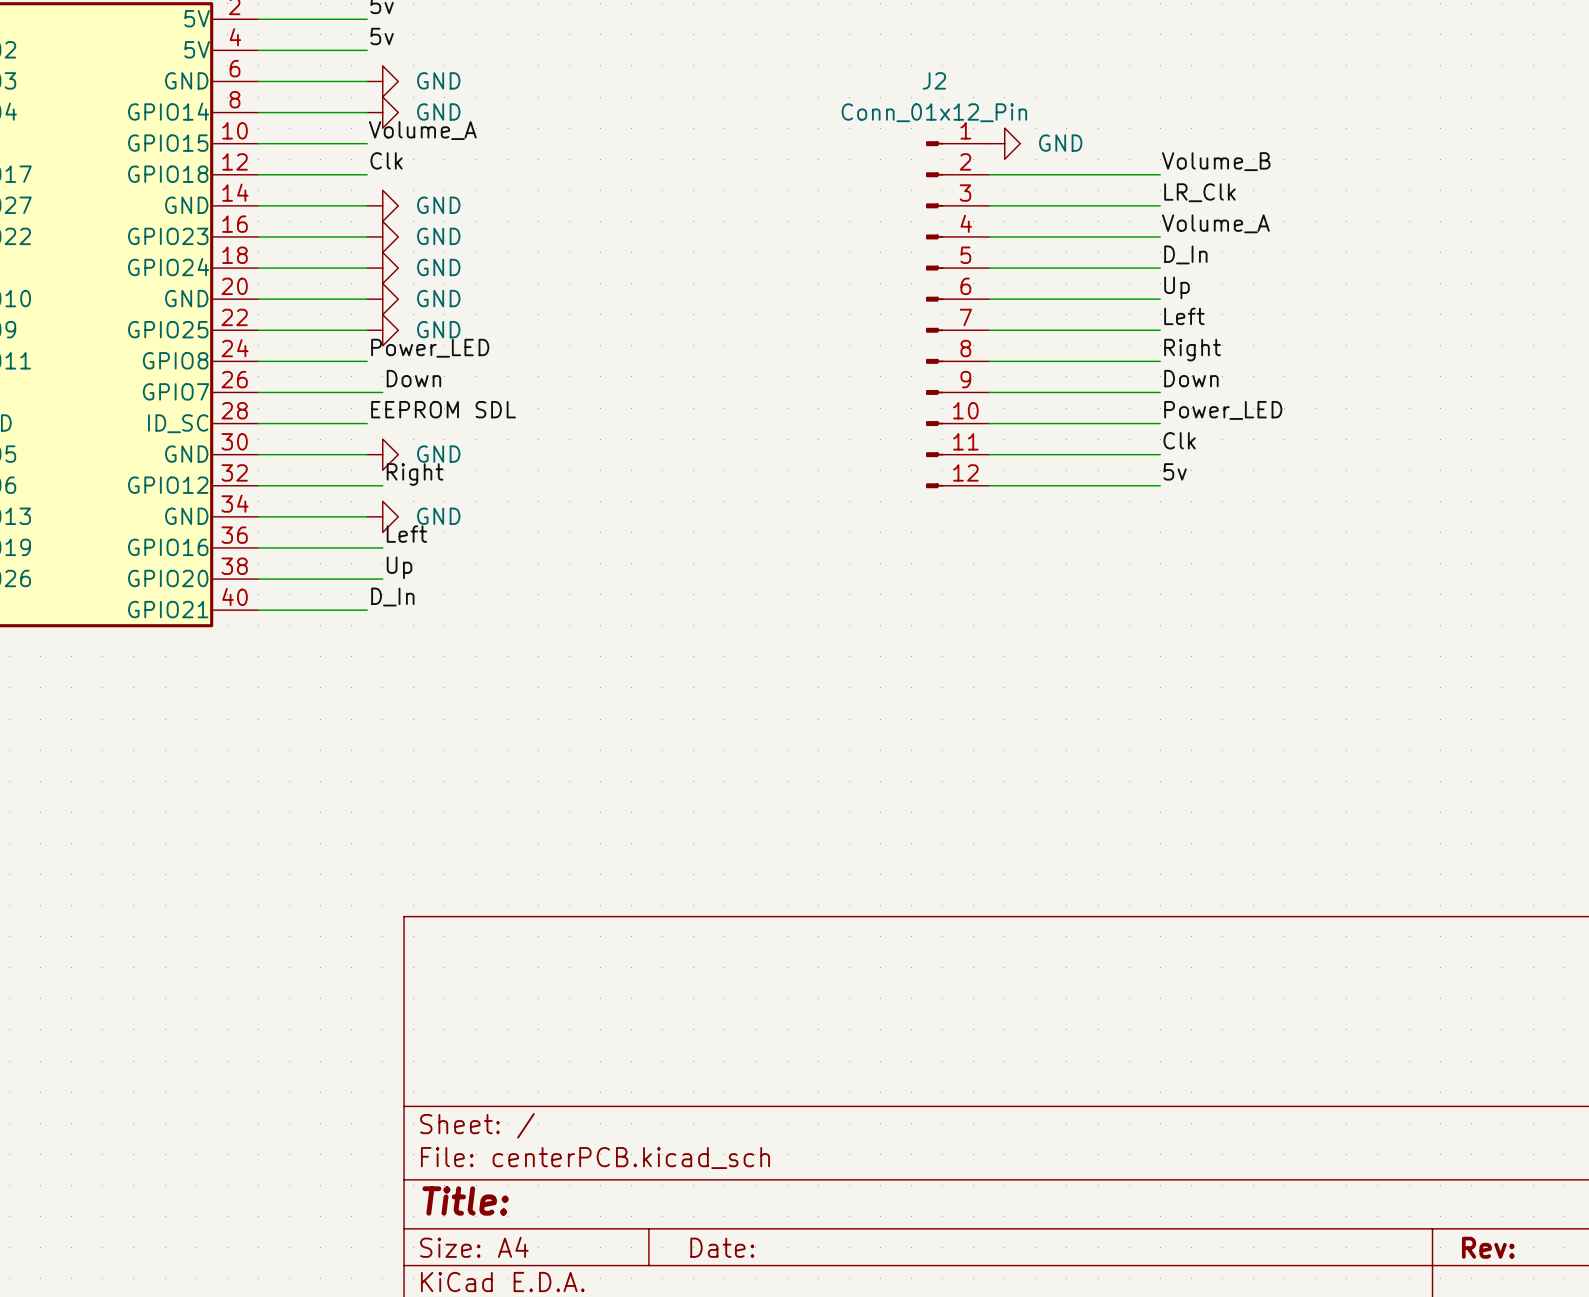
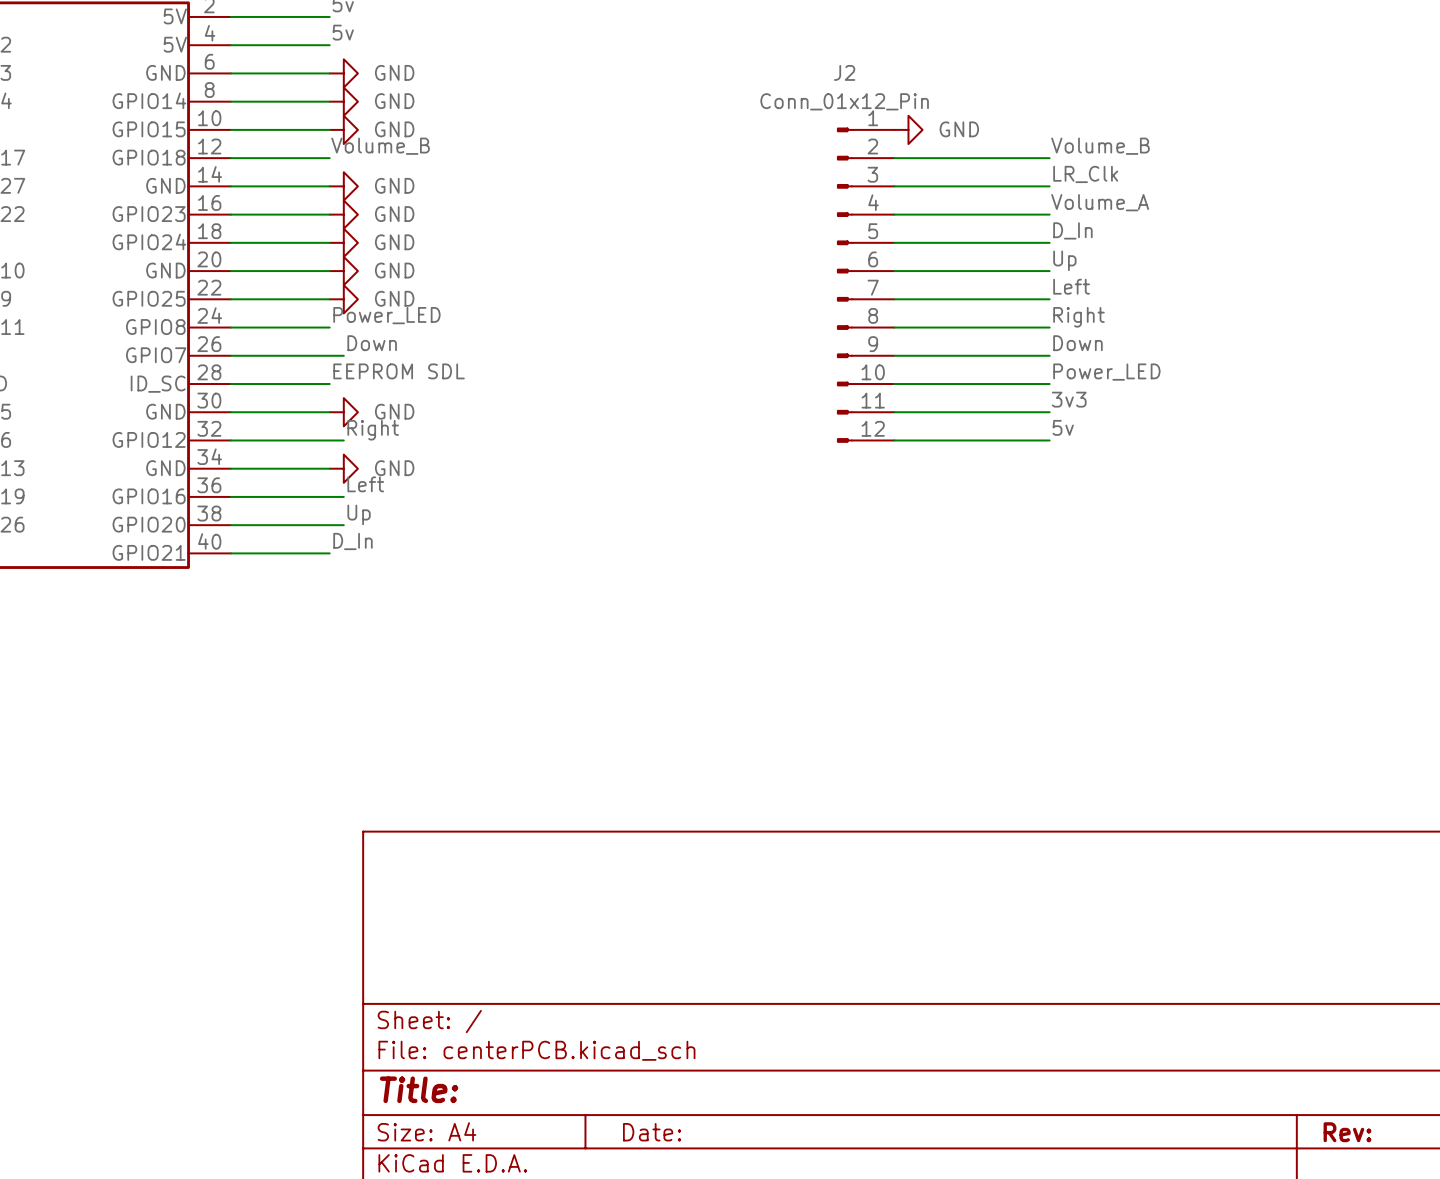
label: Volume_A (422, 130) -> none
power symbol: none -> GND (343, 129)
label: Clk (386, 160) -> Volume_B (380, 146)
label: Clk (1179, 440) -> 3v3 (1069, 399)

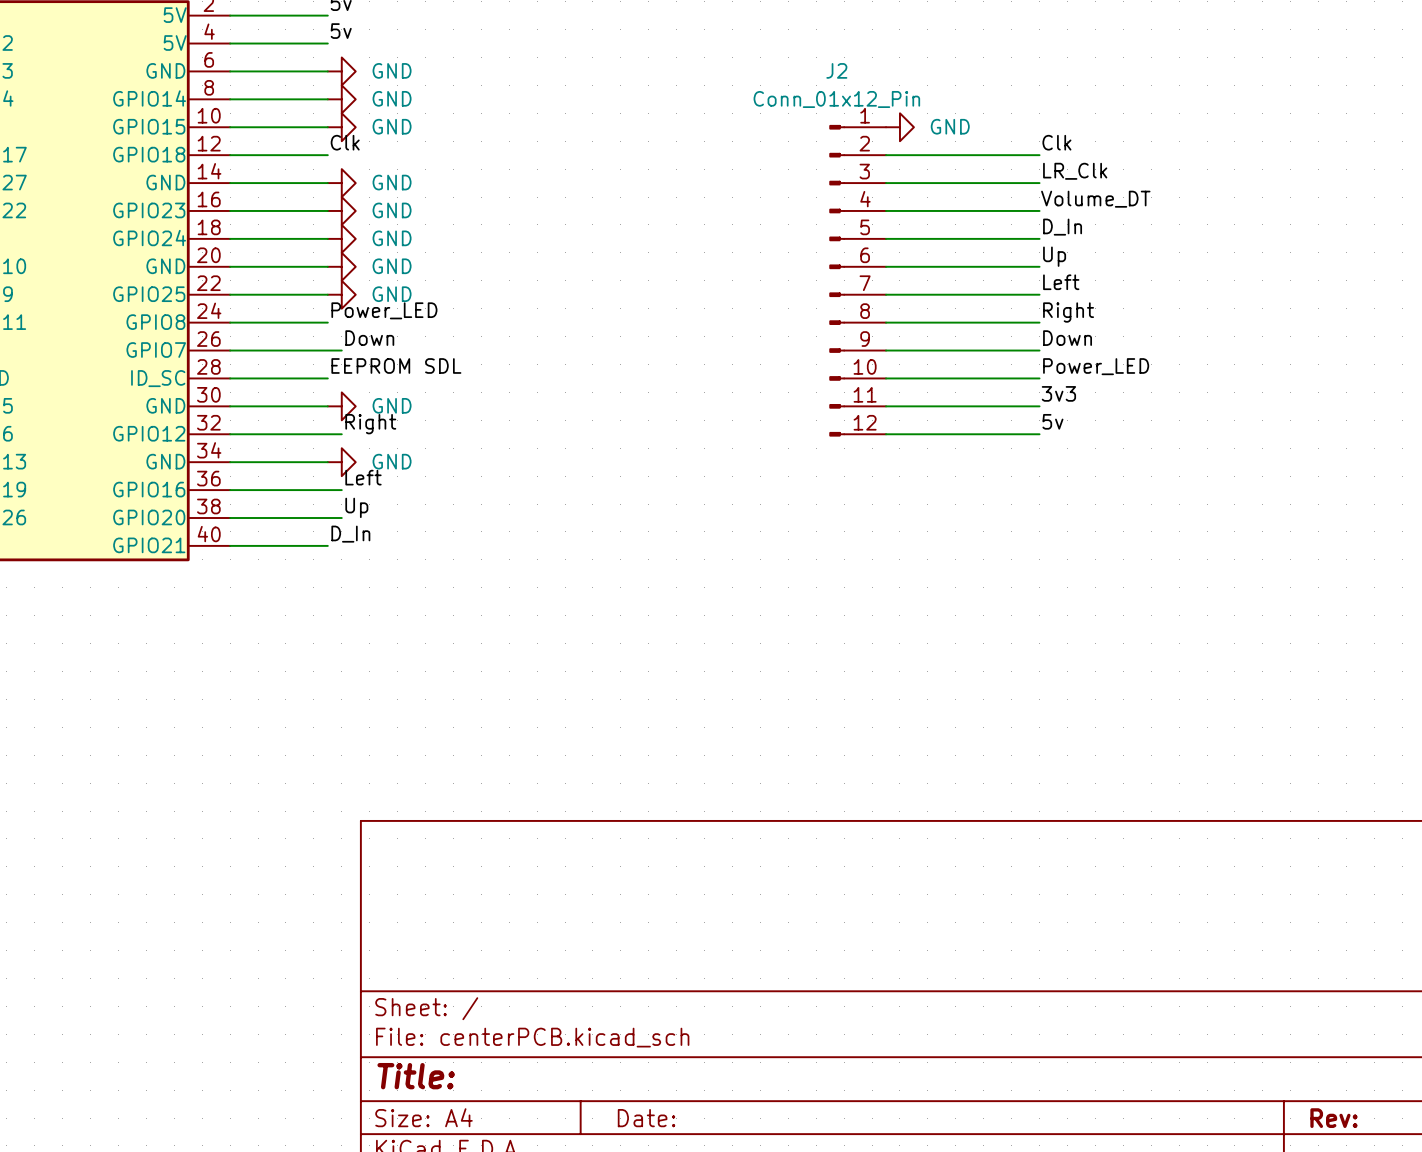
label: Volume_B (380, 146) -> Clk (345, 142)
label: Volume_B (1100, 146) -> Clk (1056, 142)
label: Volume_A (1100, 202) -> Volume_DT (1095, 199)

